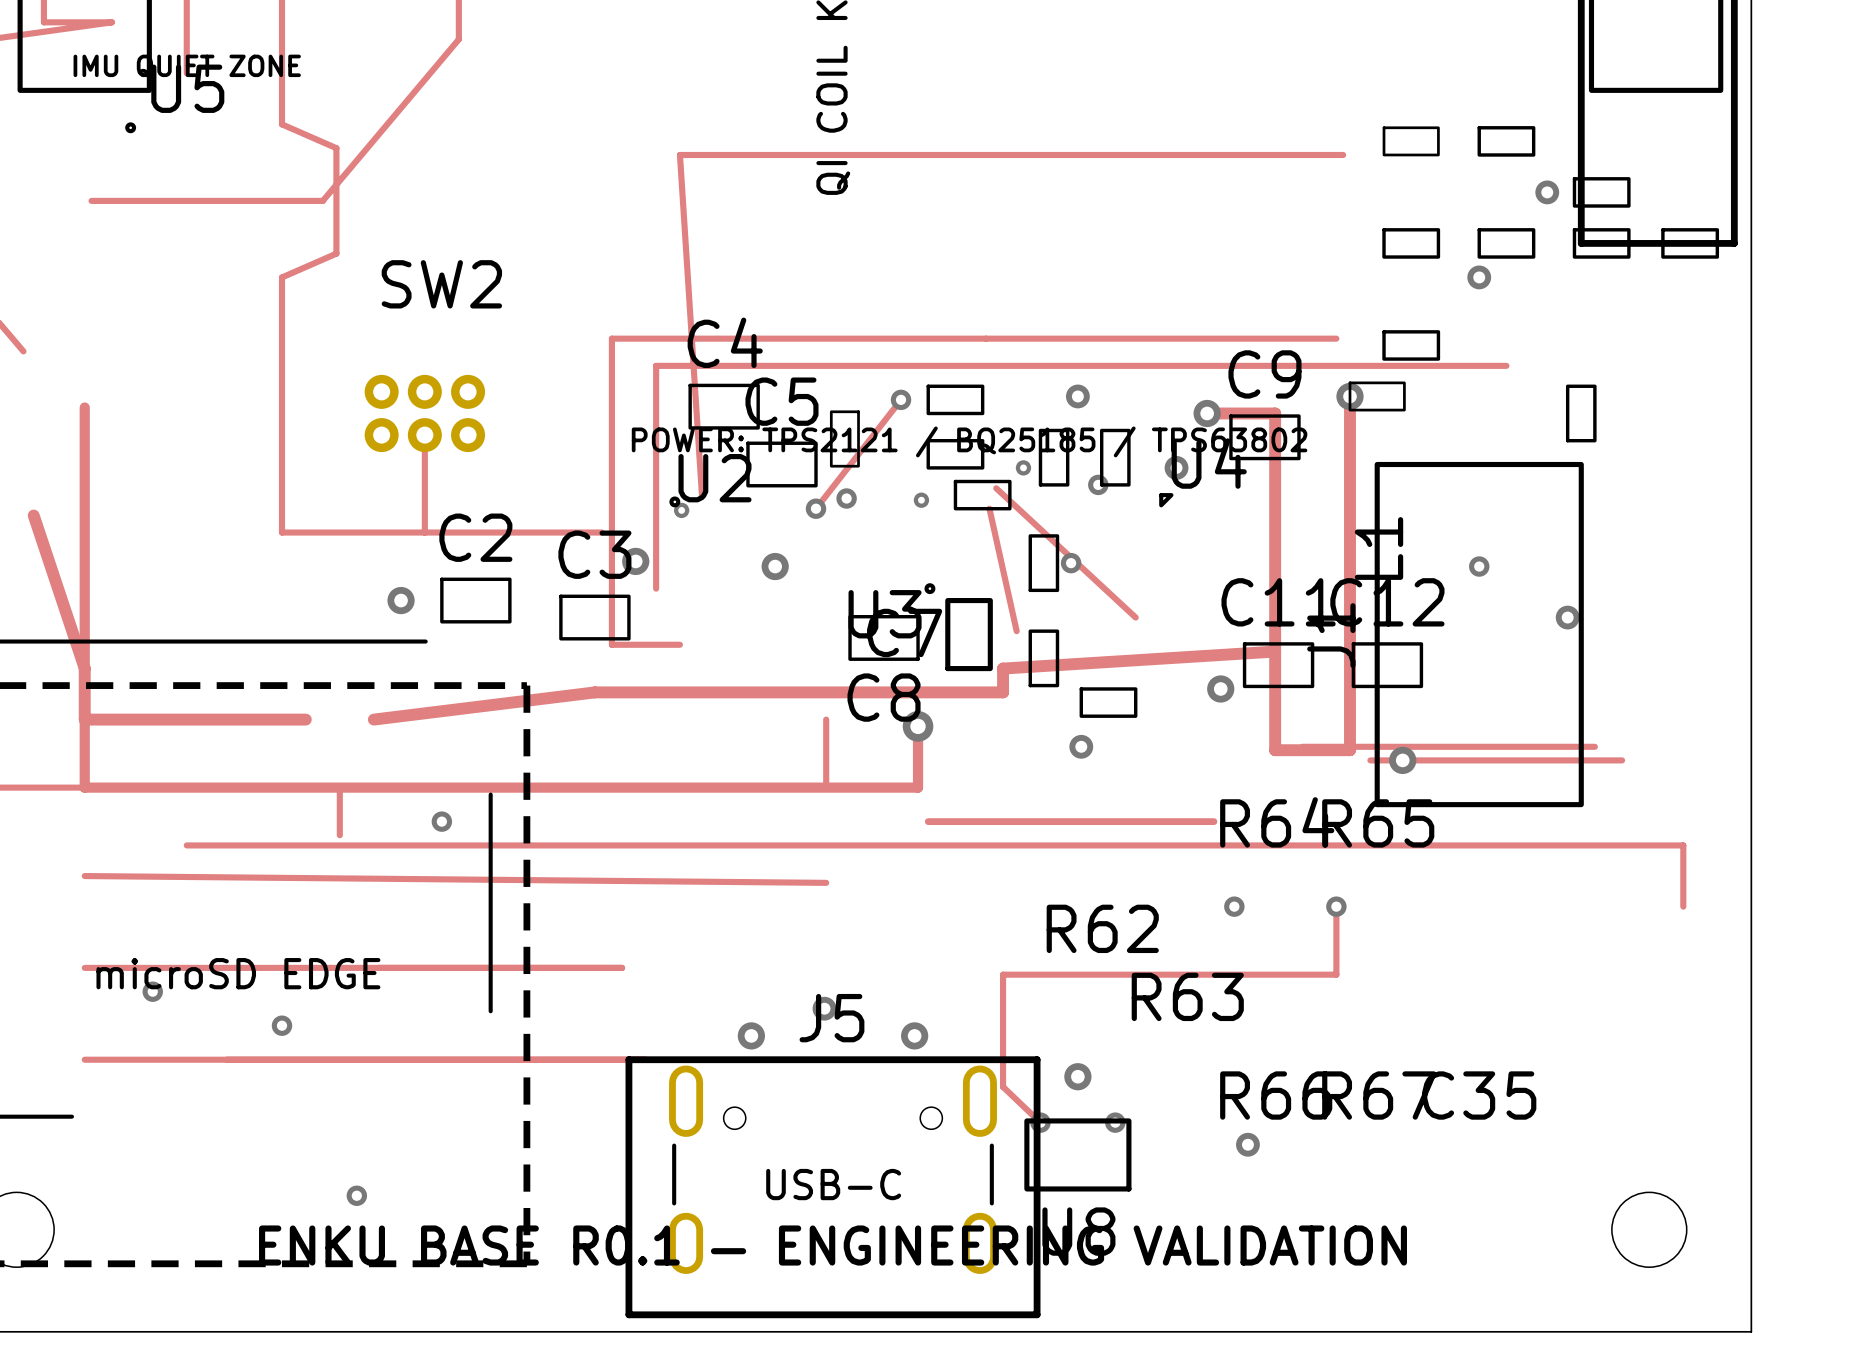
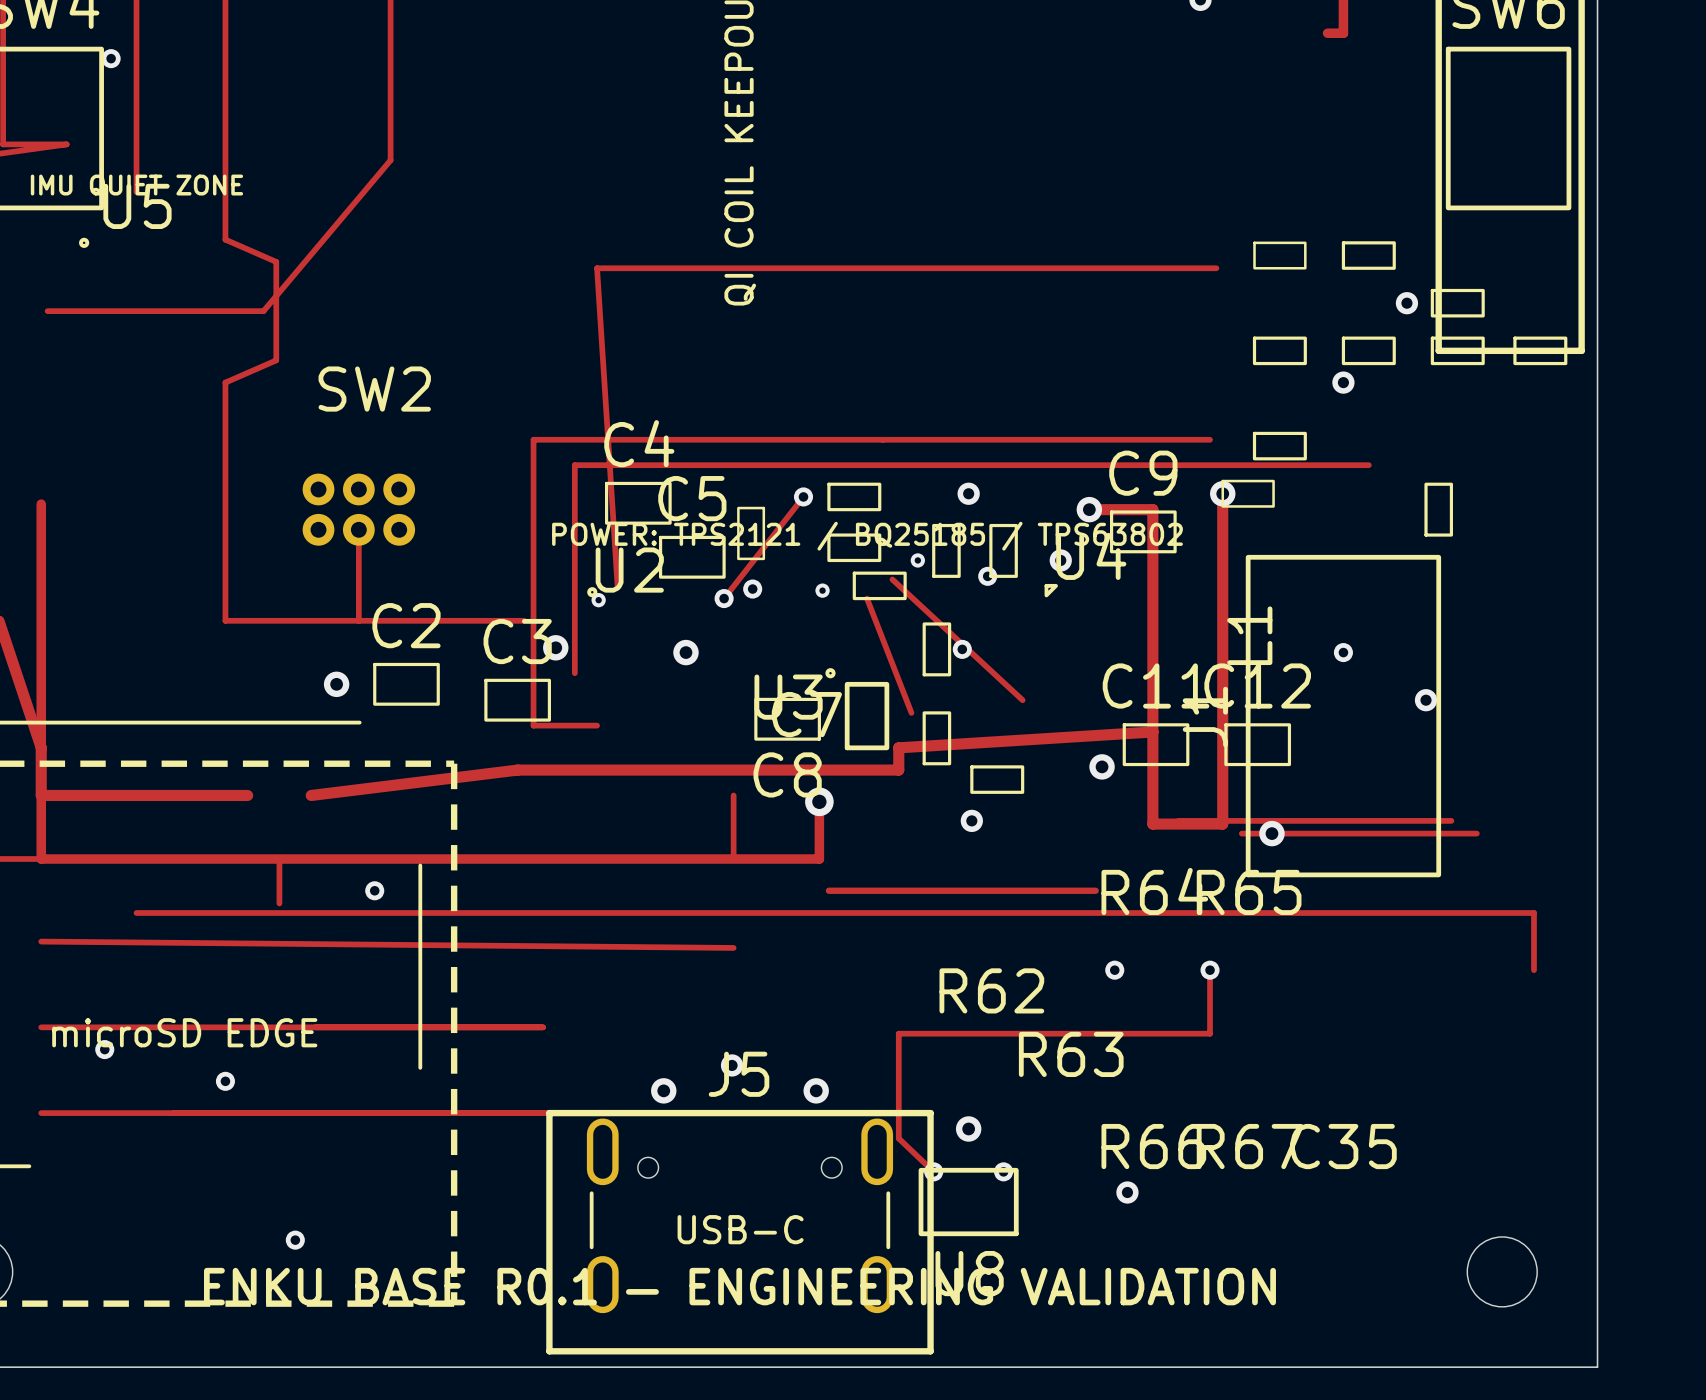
track: (989, 508) (1016, 631) -> (867, 598) (911, 712)

